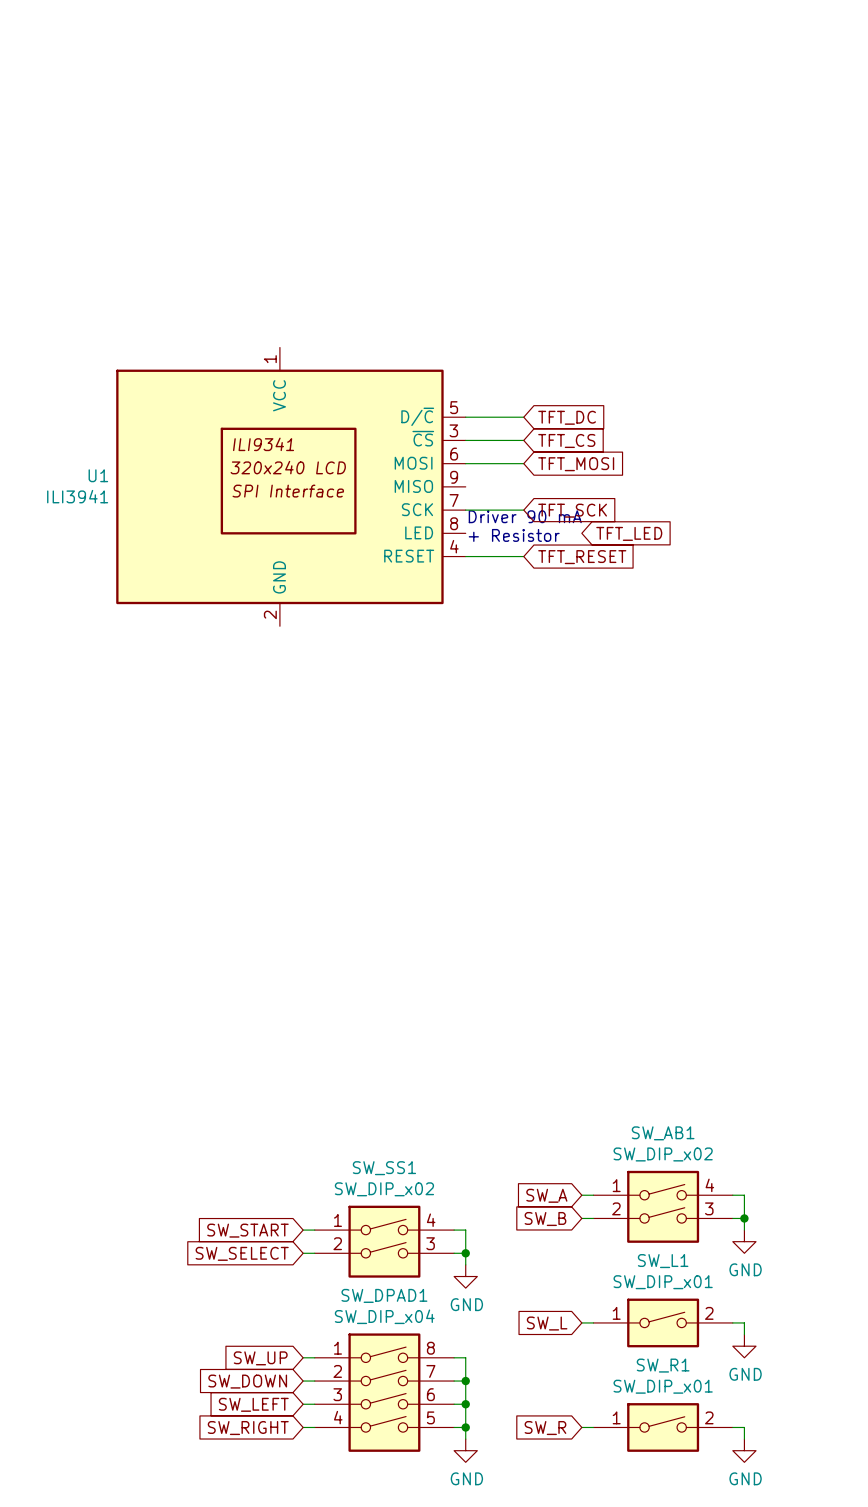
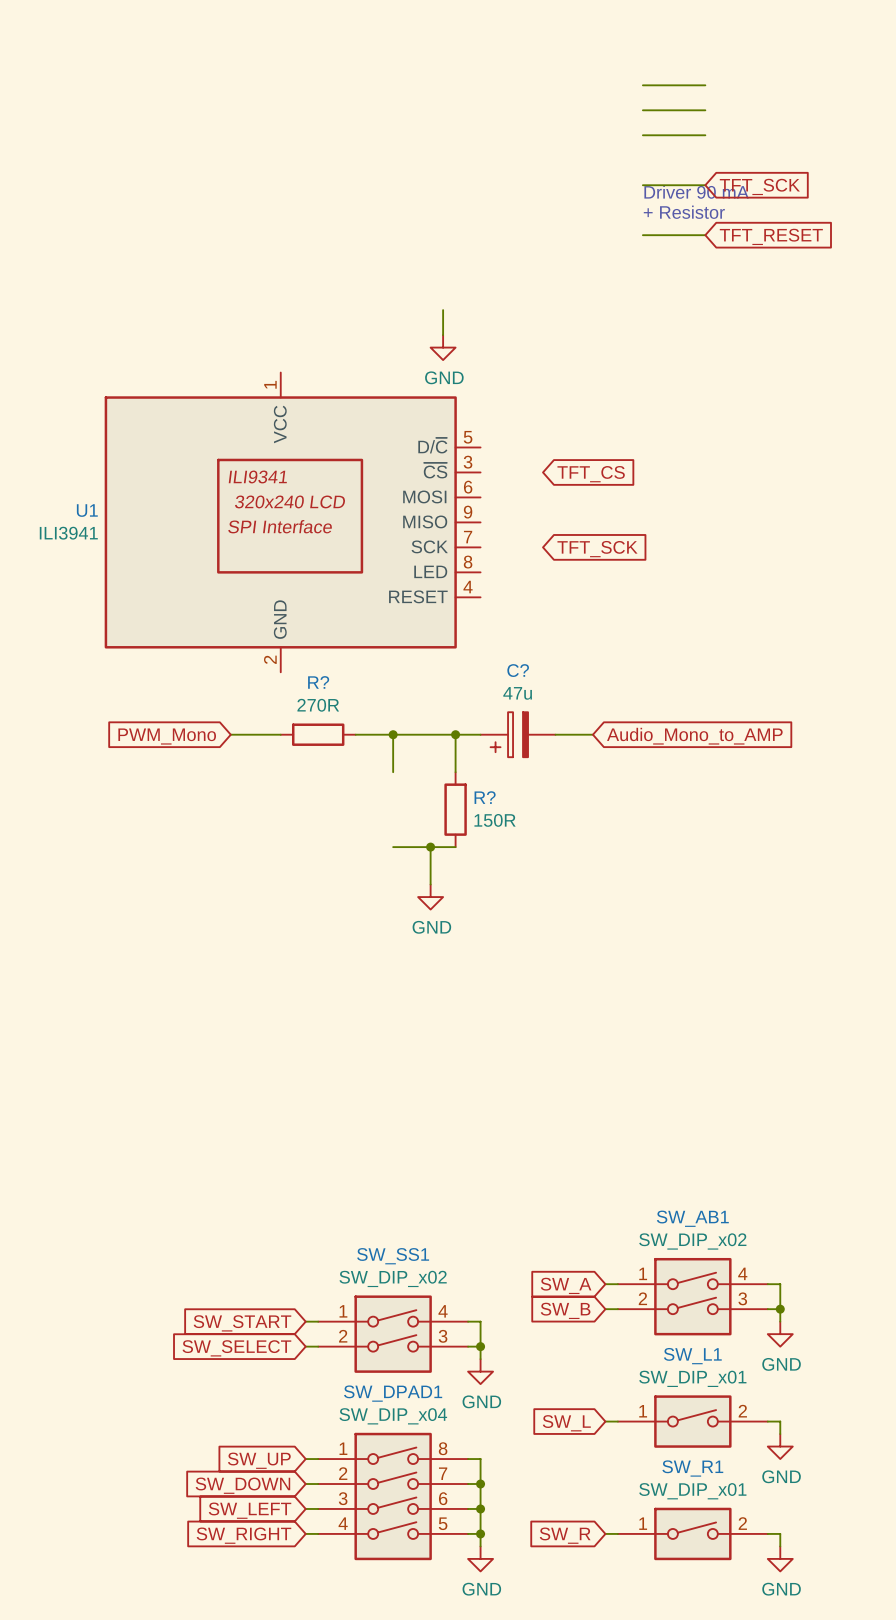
wire: none -> (642, 85) (705, 85)
wire: none -> (642, 110) (705, 110)
wire: none -> (642, 135) (705, 135)
wire: none -> (642, 185) (705, 185)
global label: none -> TFT_SCK (759, 186)
text: none -> Driver 90 mA (696, 192)
text: none -> + Resistor (684, 212)
wire: none -> (642, 235) (705, 235)
global label: none -> TFT_RESET (771, 236)
wire: none -> (443, 310) (443, 335)
power symbol: none -> GND (443, 347)
wire: (465, 417) (523, 417) -> none
global label: TFT_DC (567, 417) -> none
wire: (465, 440) (523, 440) -> none
wire: (465, 463) (523, 463) -> none
global label: TFT_MOSI (576, 464) -> none
wire: (465, 510) (523, 510) -> none
text: Driver 90 mA (525, 516) -> none
global label: TFT_LED (629, 533) -> none
text: + Resistor (514, 535) -> none
wire: (465, 556) (523, 556) -> none
global label: TFT_RESET (582, 557) -> none
global label: none -> PWM_Mono (167, 736)
wire: none -> (230, 734) (280, 734)
R?: none -> 270R (318, 734)
wire: none -> (355, 734) (480, 734)
wire: none -> (393, 734) (393, 772)
junction: none -> (393, 734)
wire: none -> (455, 734) (455, 772)
junction: none -> (455, 734)
C?: none -> 47u (518, 734)
wire: none -> (555, 734) (592, 734)
global label: none -> Audio_Mono_to_AMP (694, 736)
R?: none -> 150R (455, 809)
wire: none -> (393, 847) (455, 847)
wire: none -> (430, 847) (430, 884)
junction: none -> (430, 847)
power symbol: none -> GND (430, 897)

